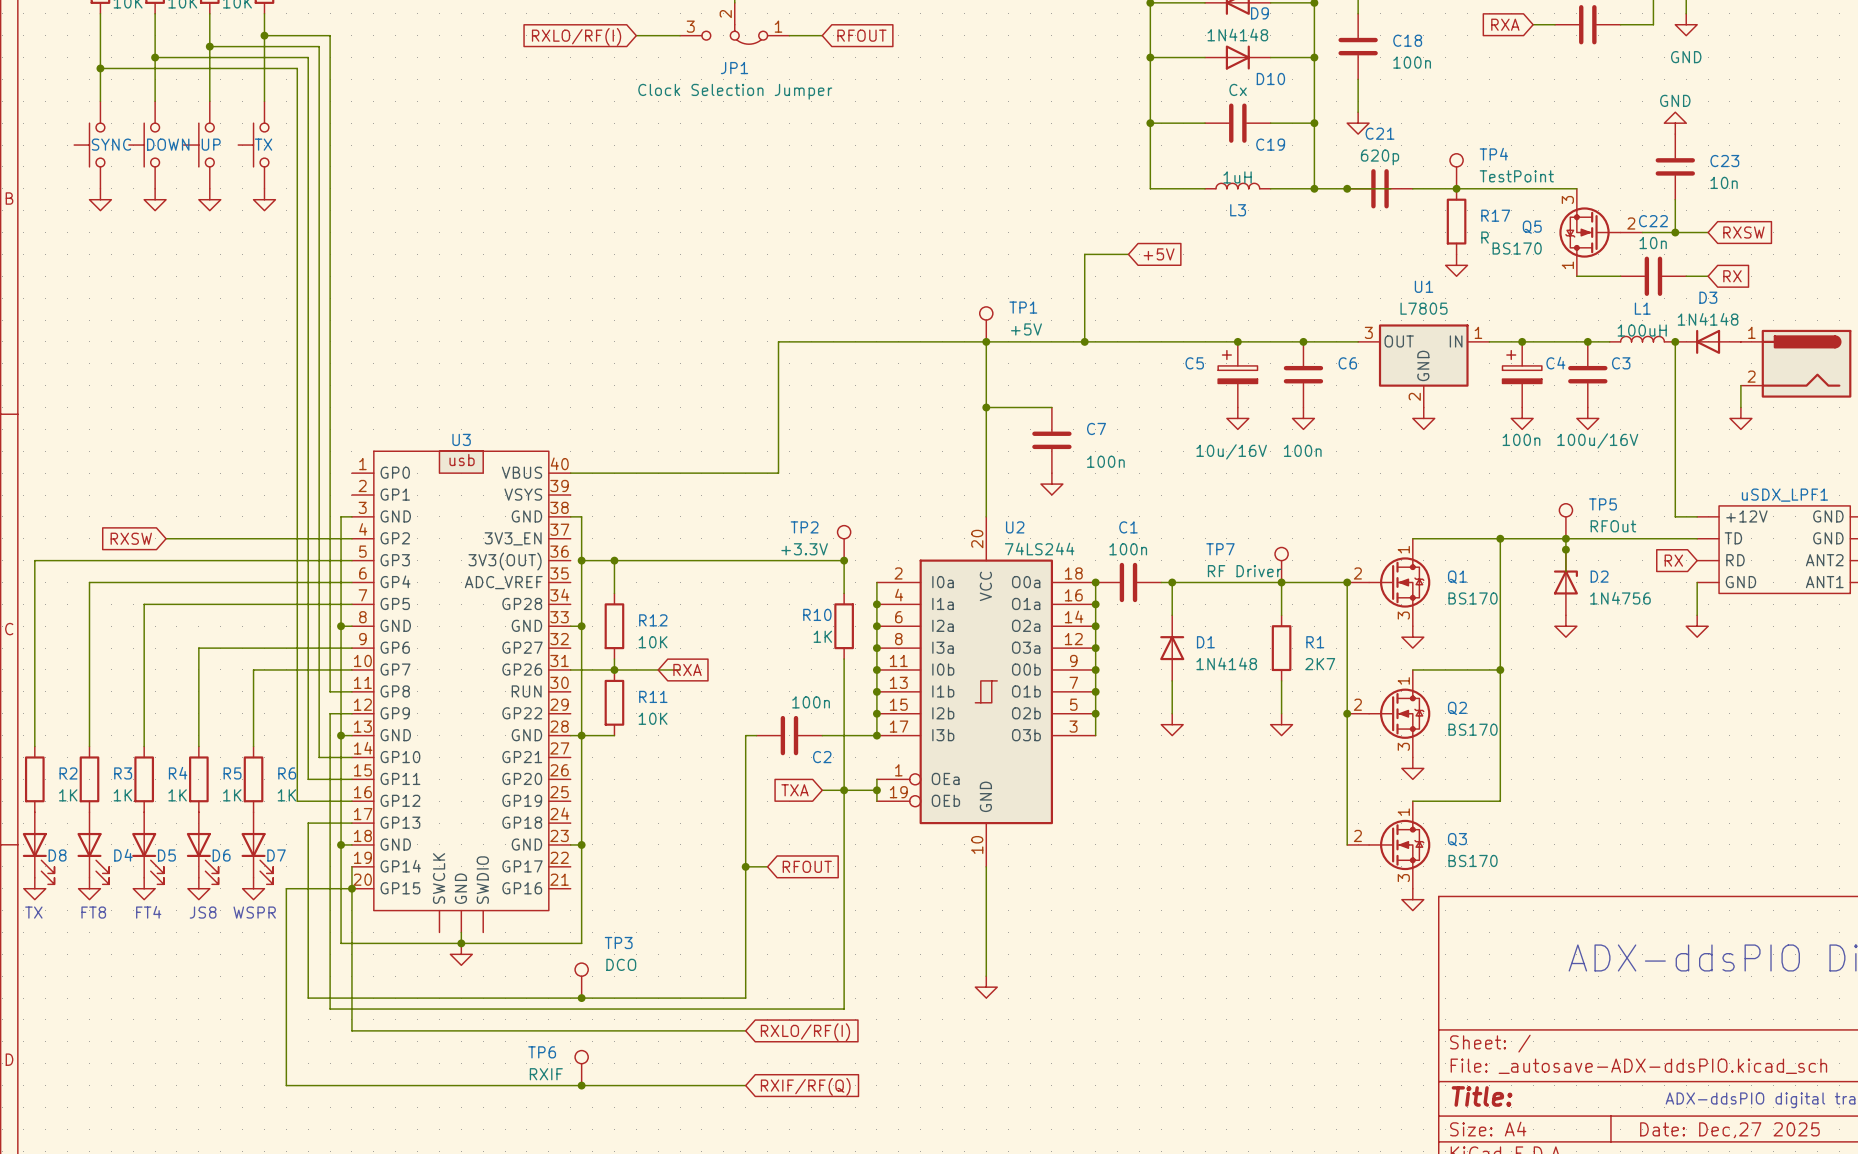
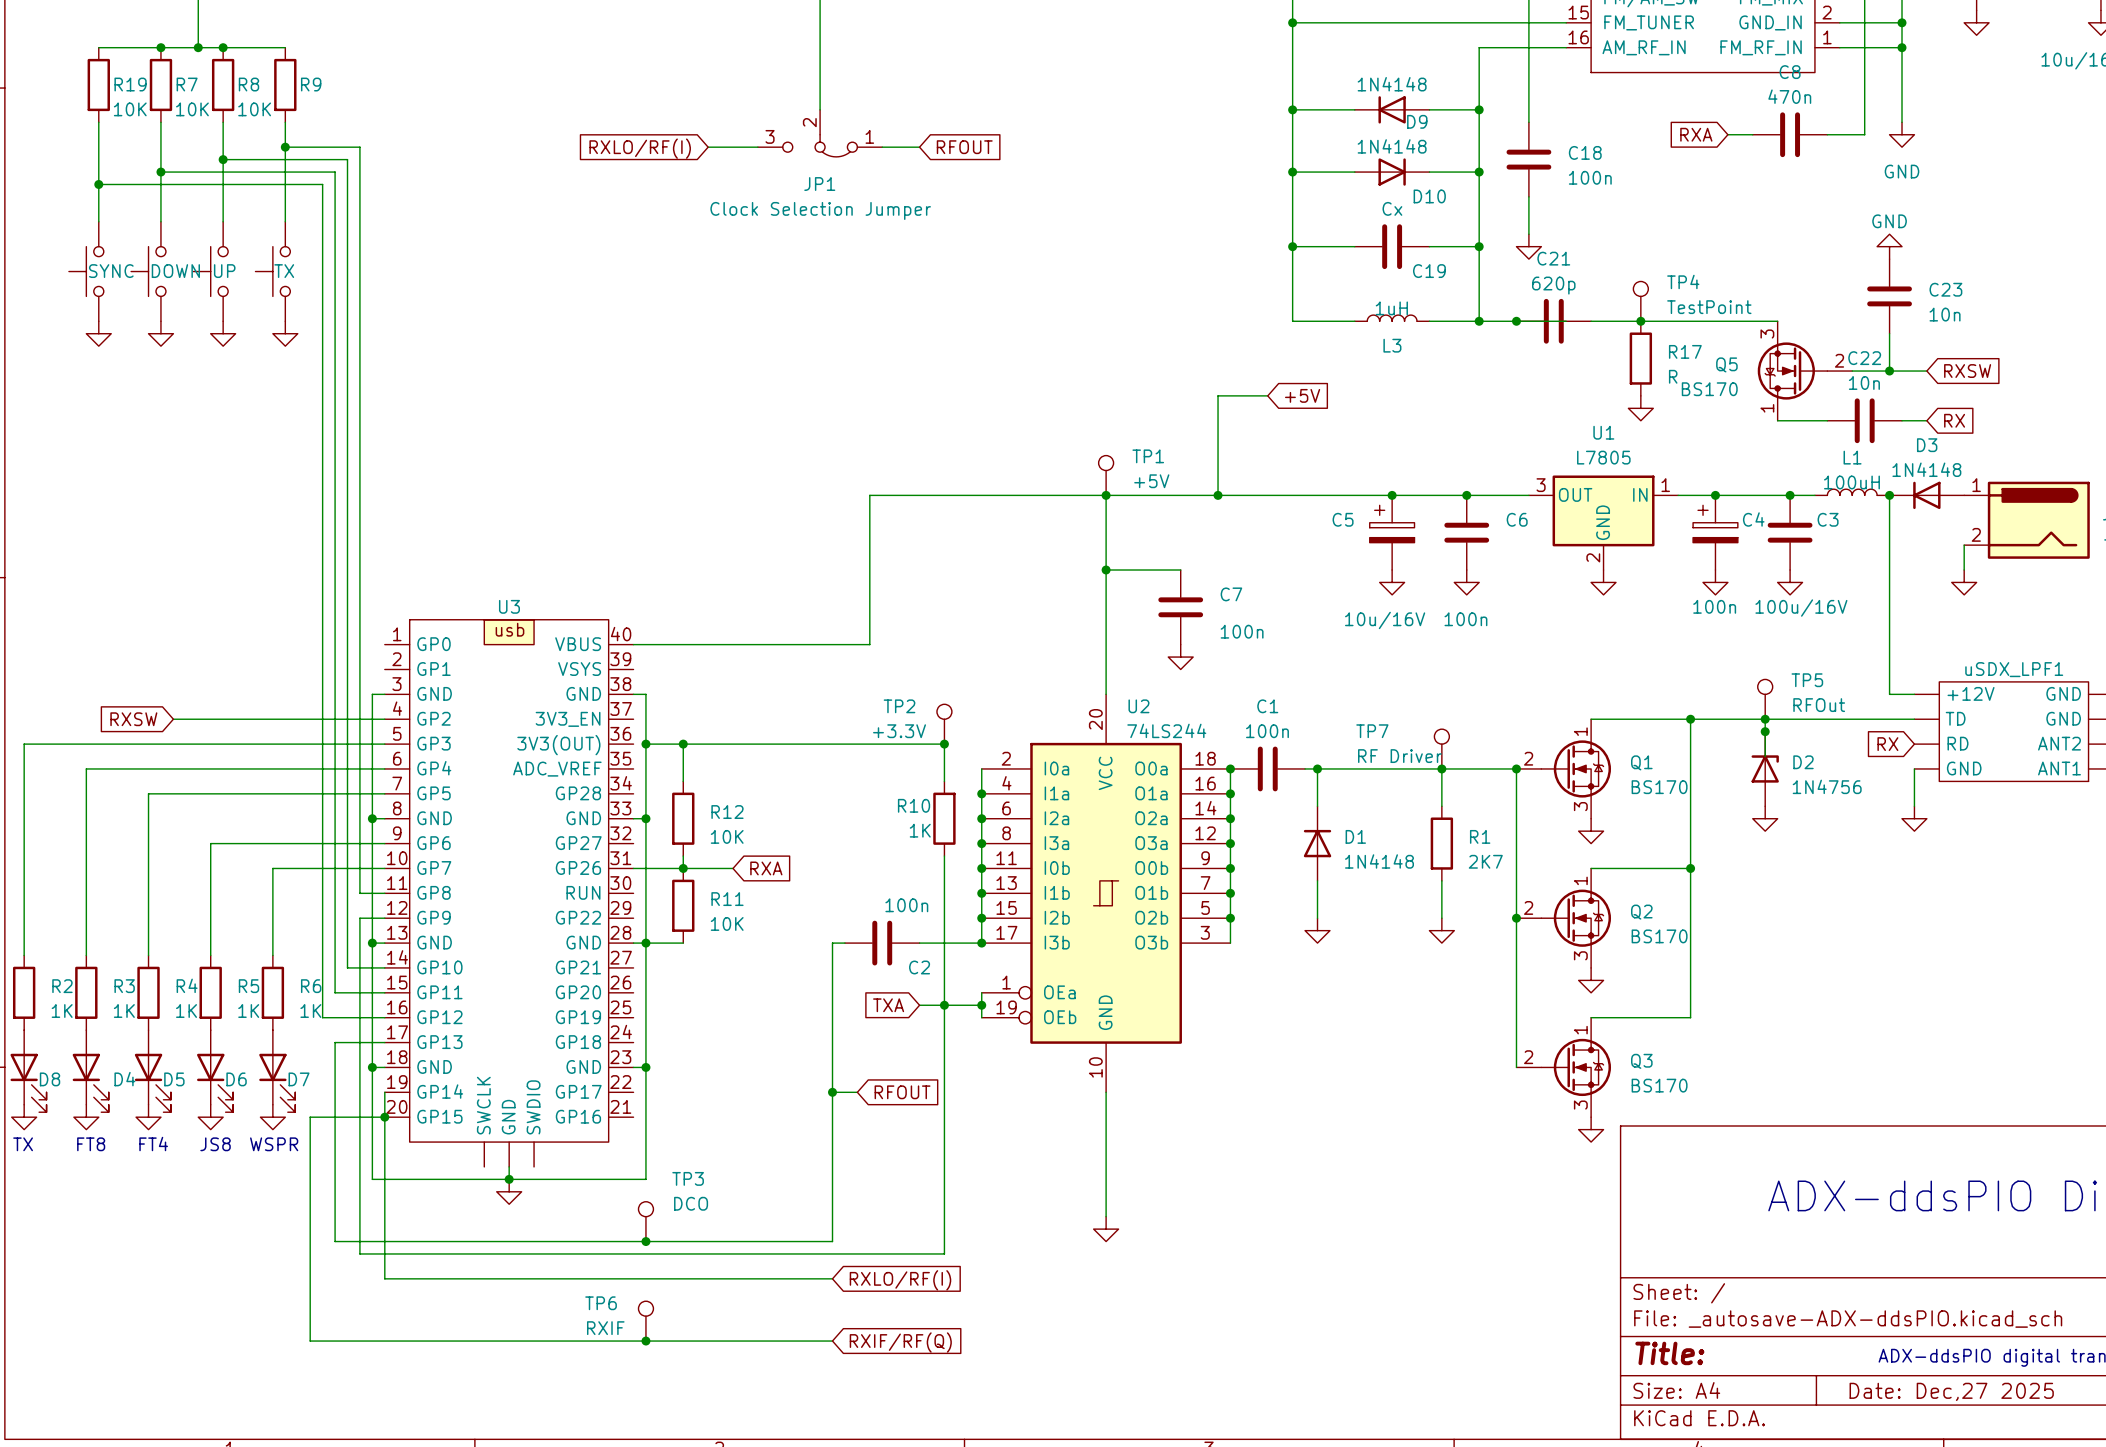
wire: (658, 669) (680, 669) -> none

